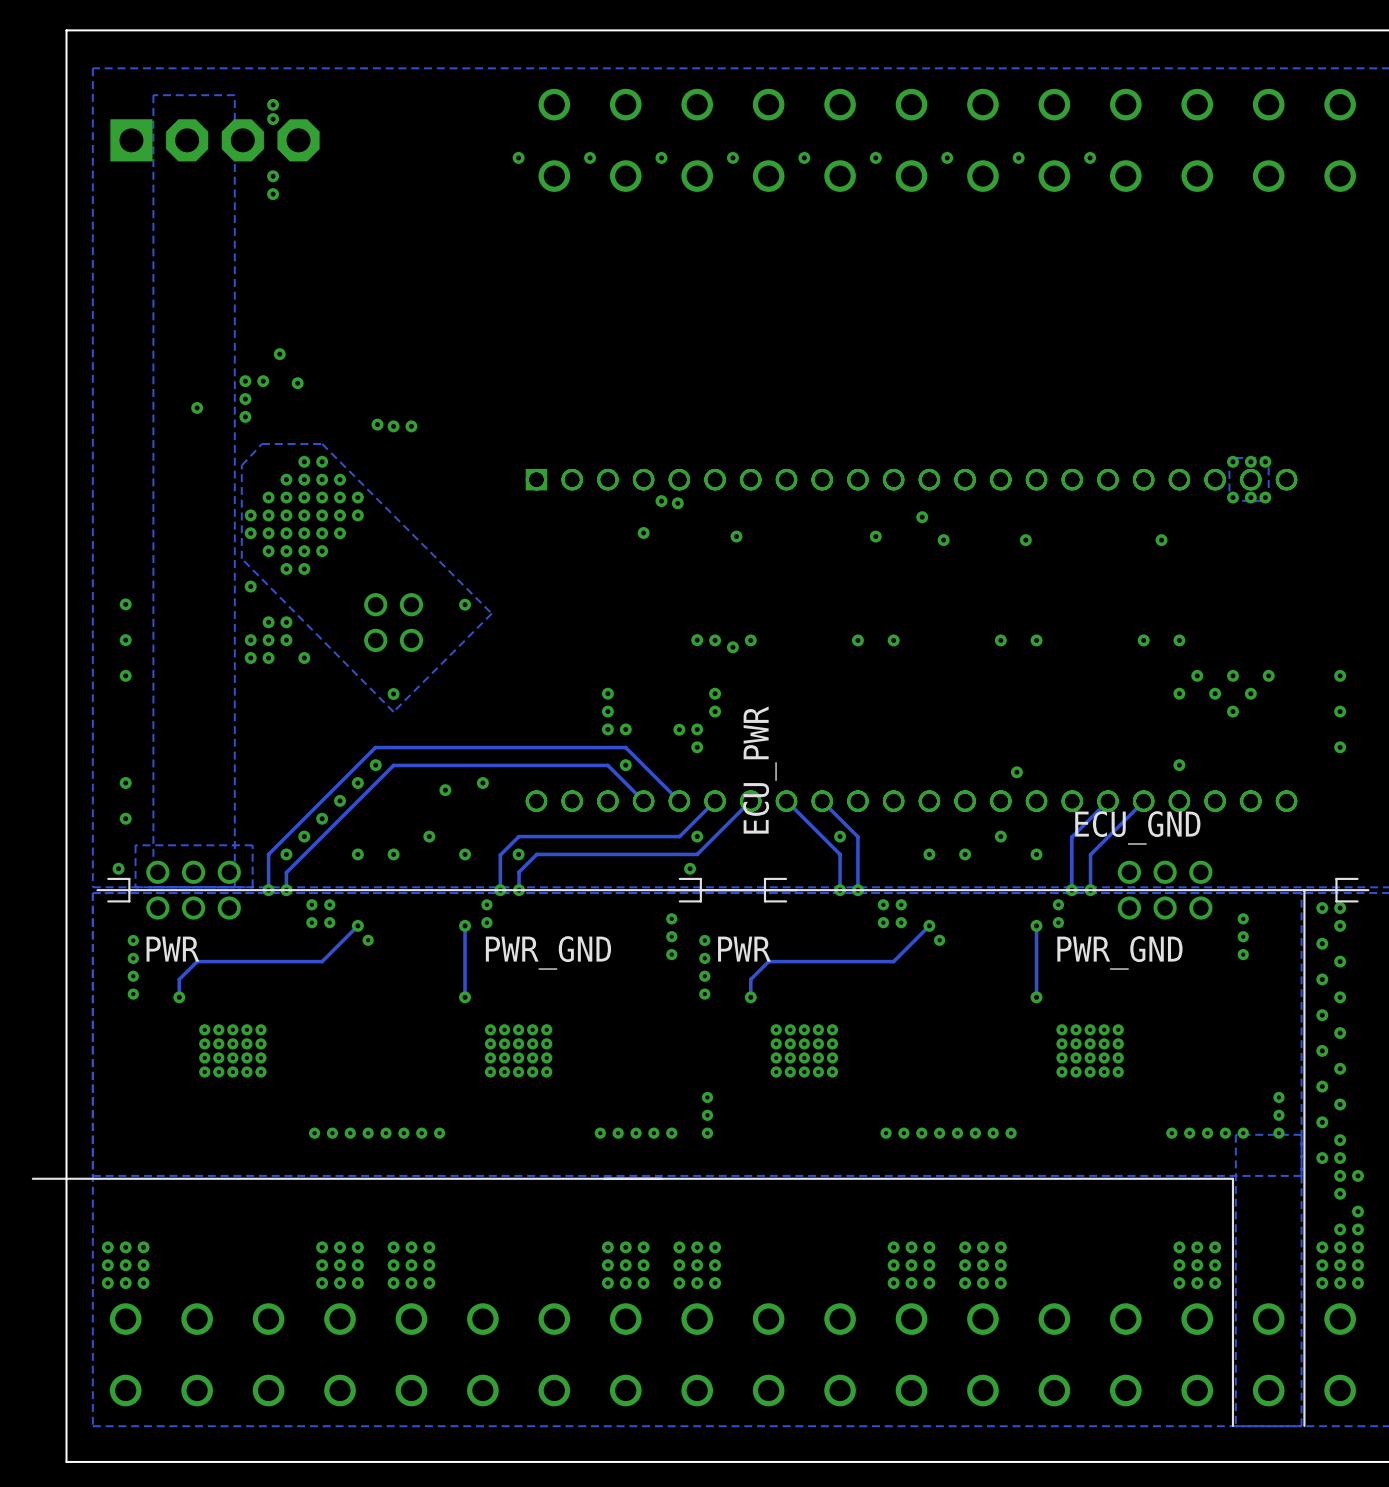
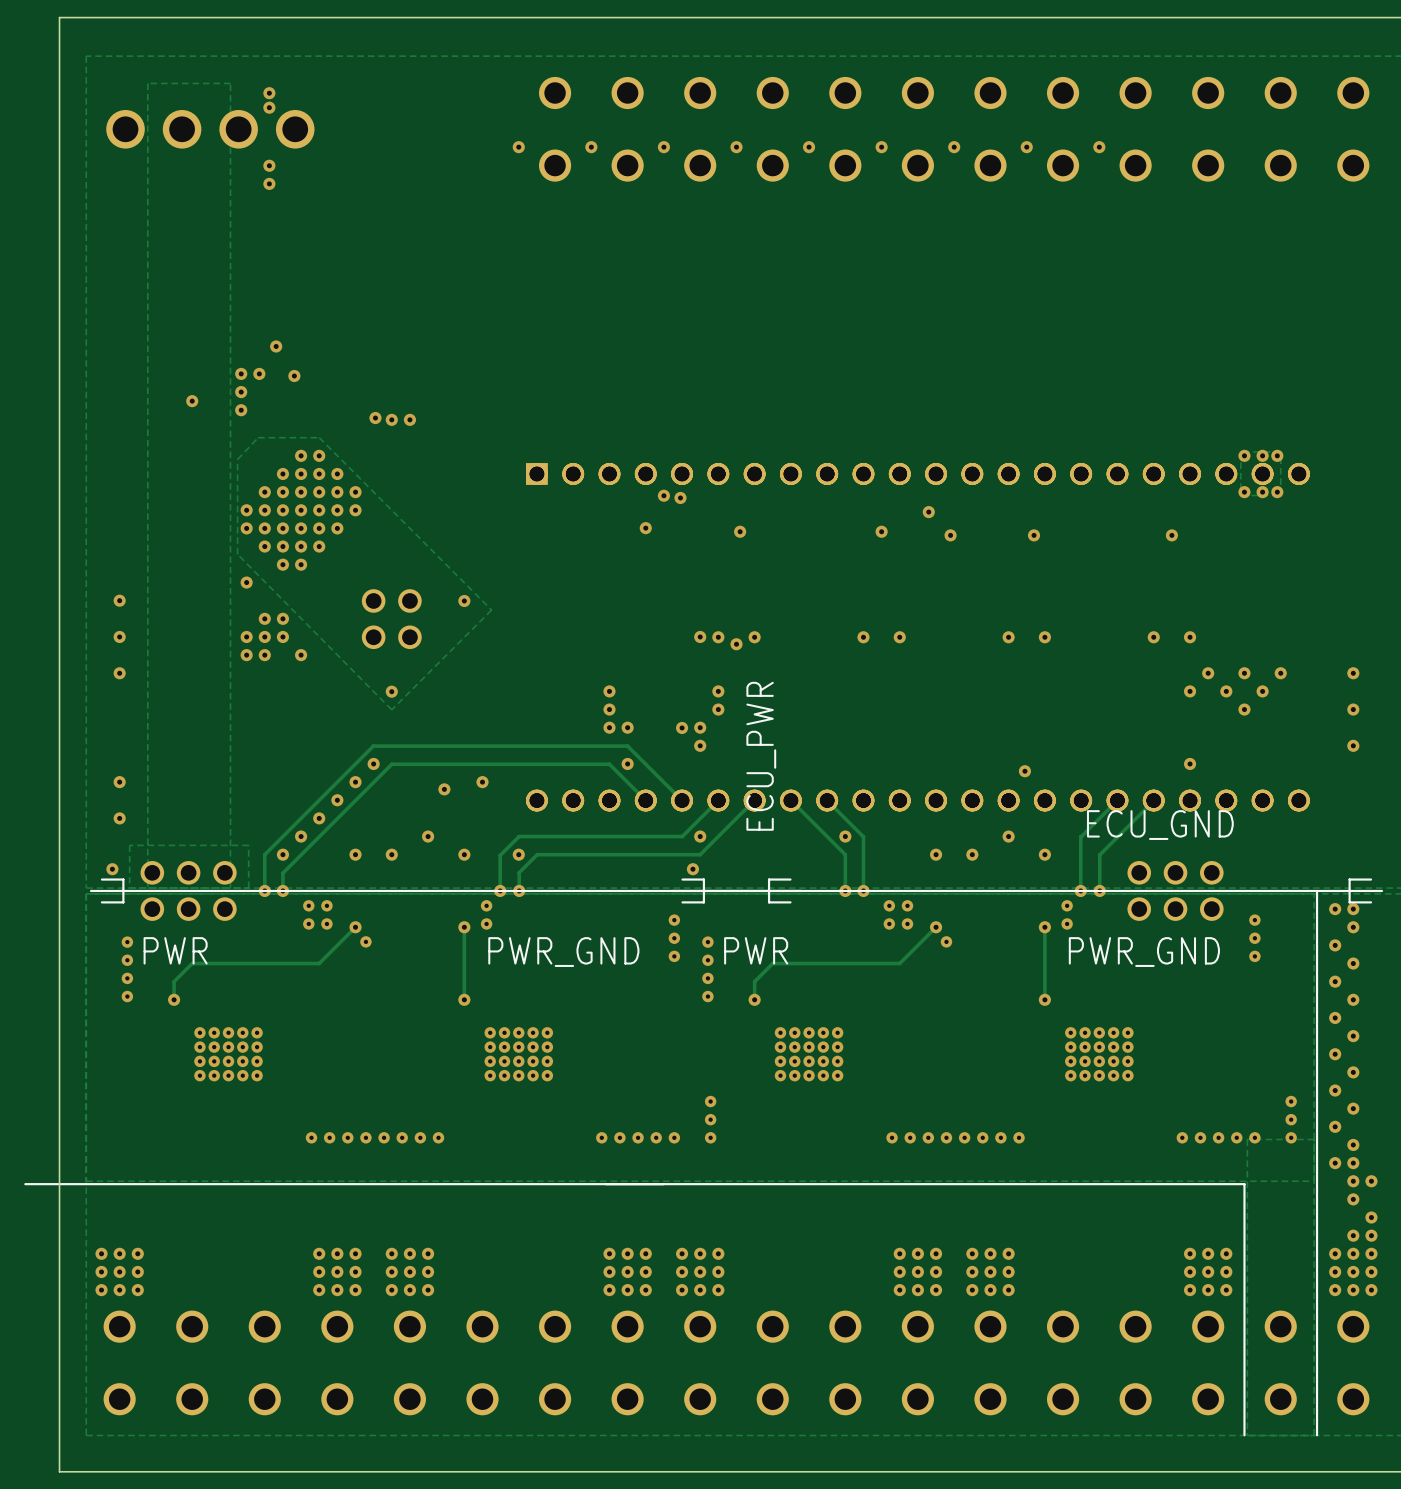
part footprint: [110, 119, 320, 162] -> [106, 110, 315, 149]

